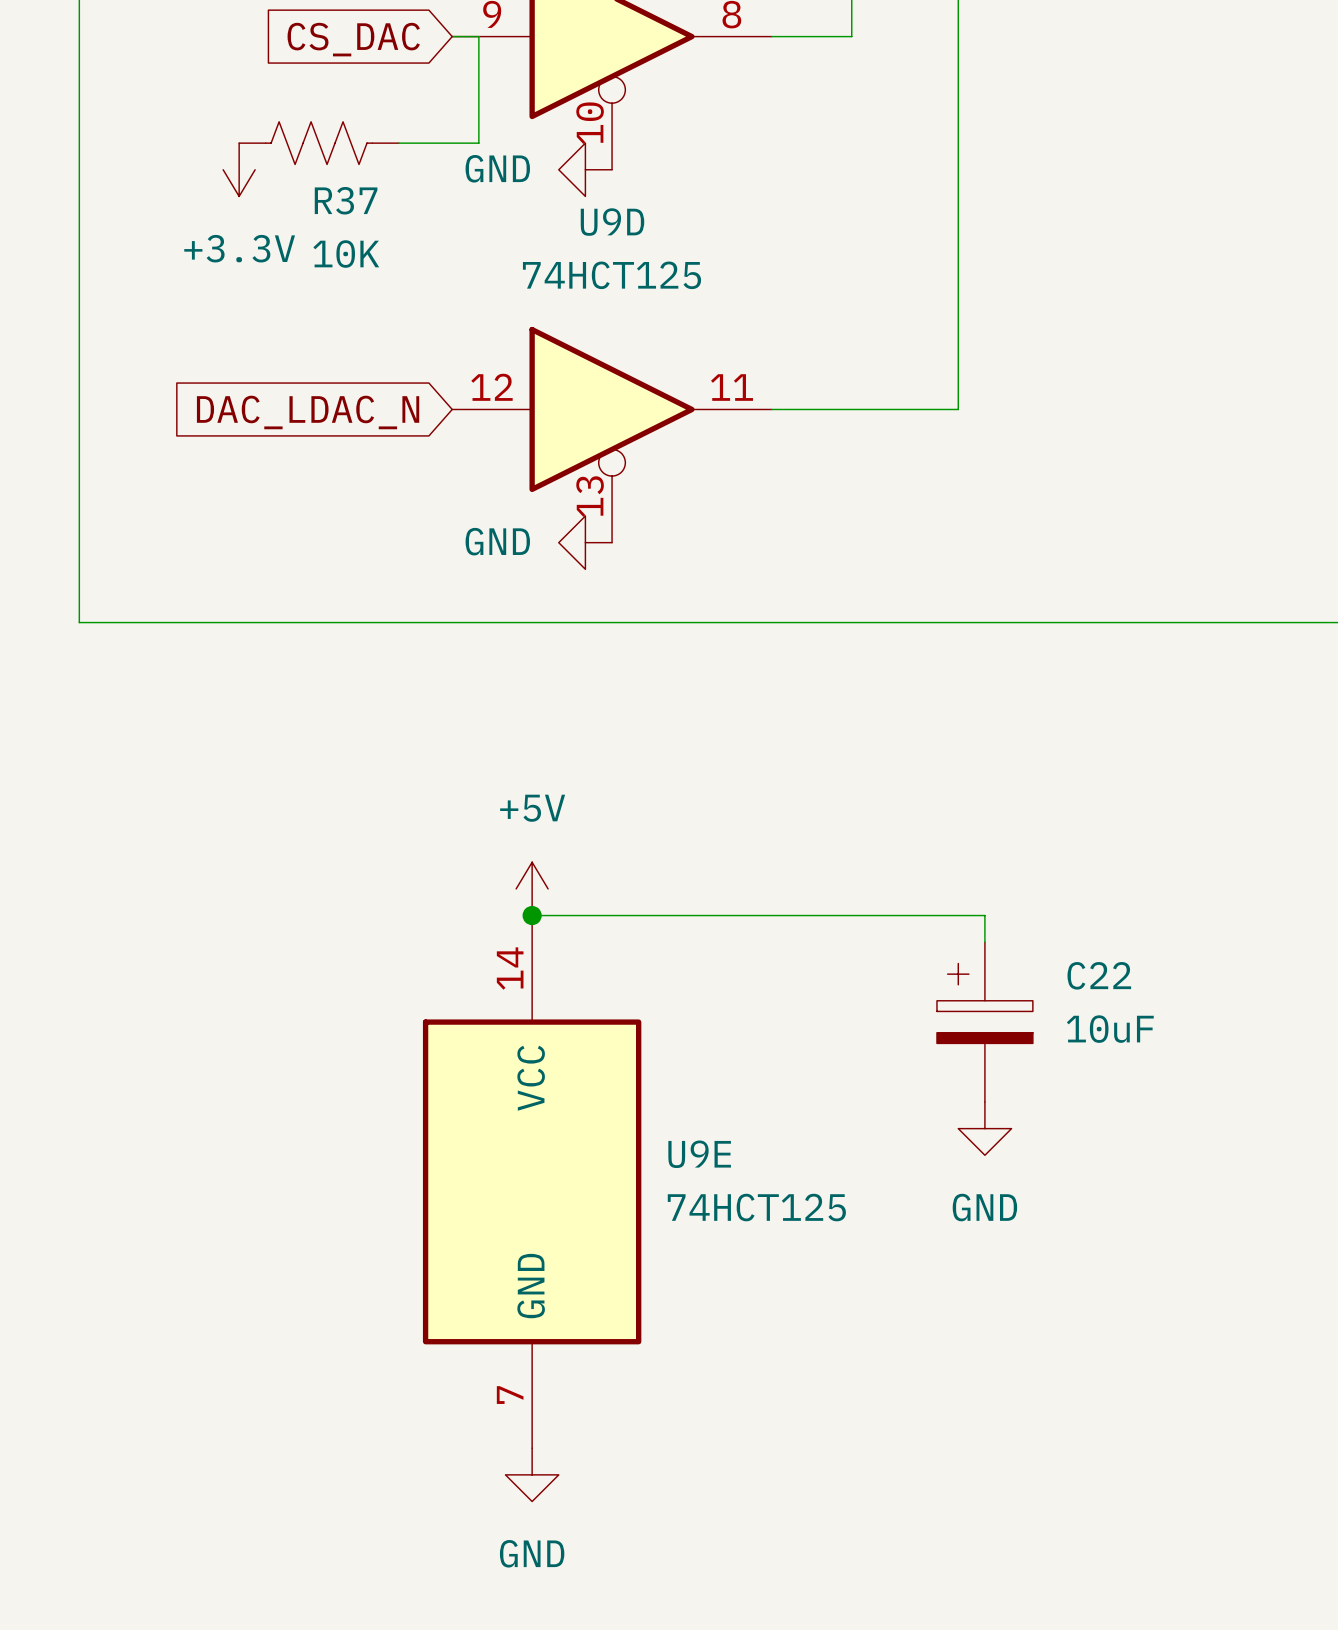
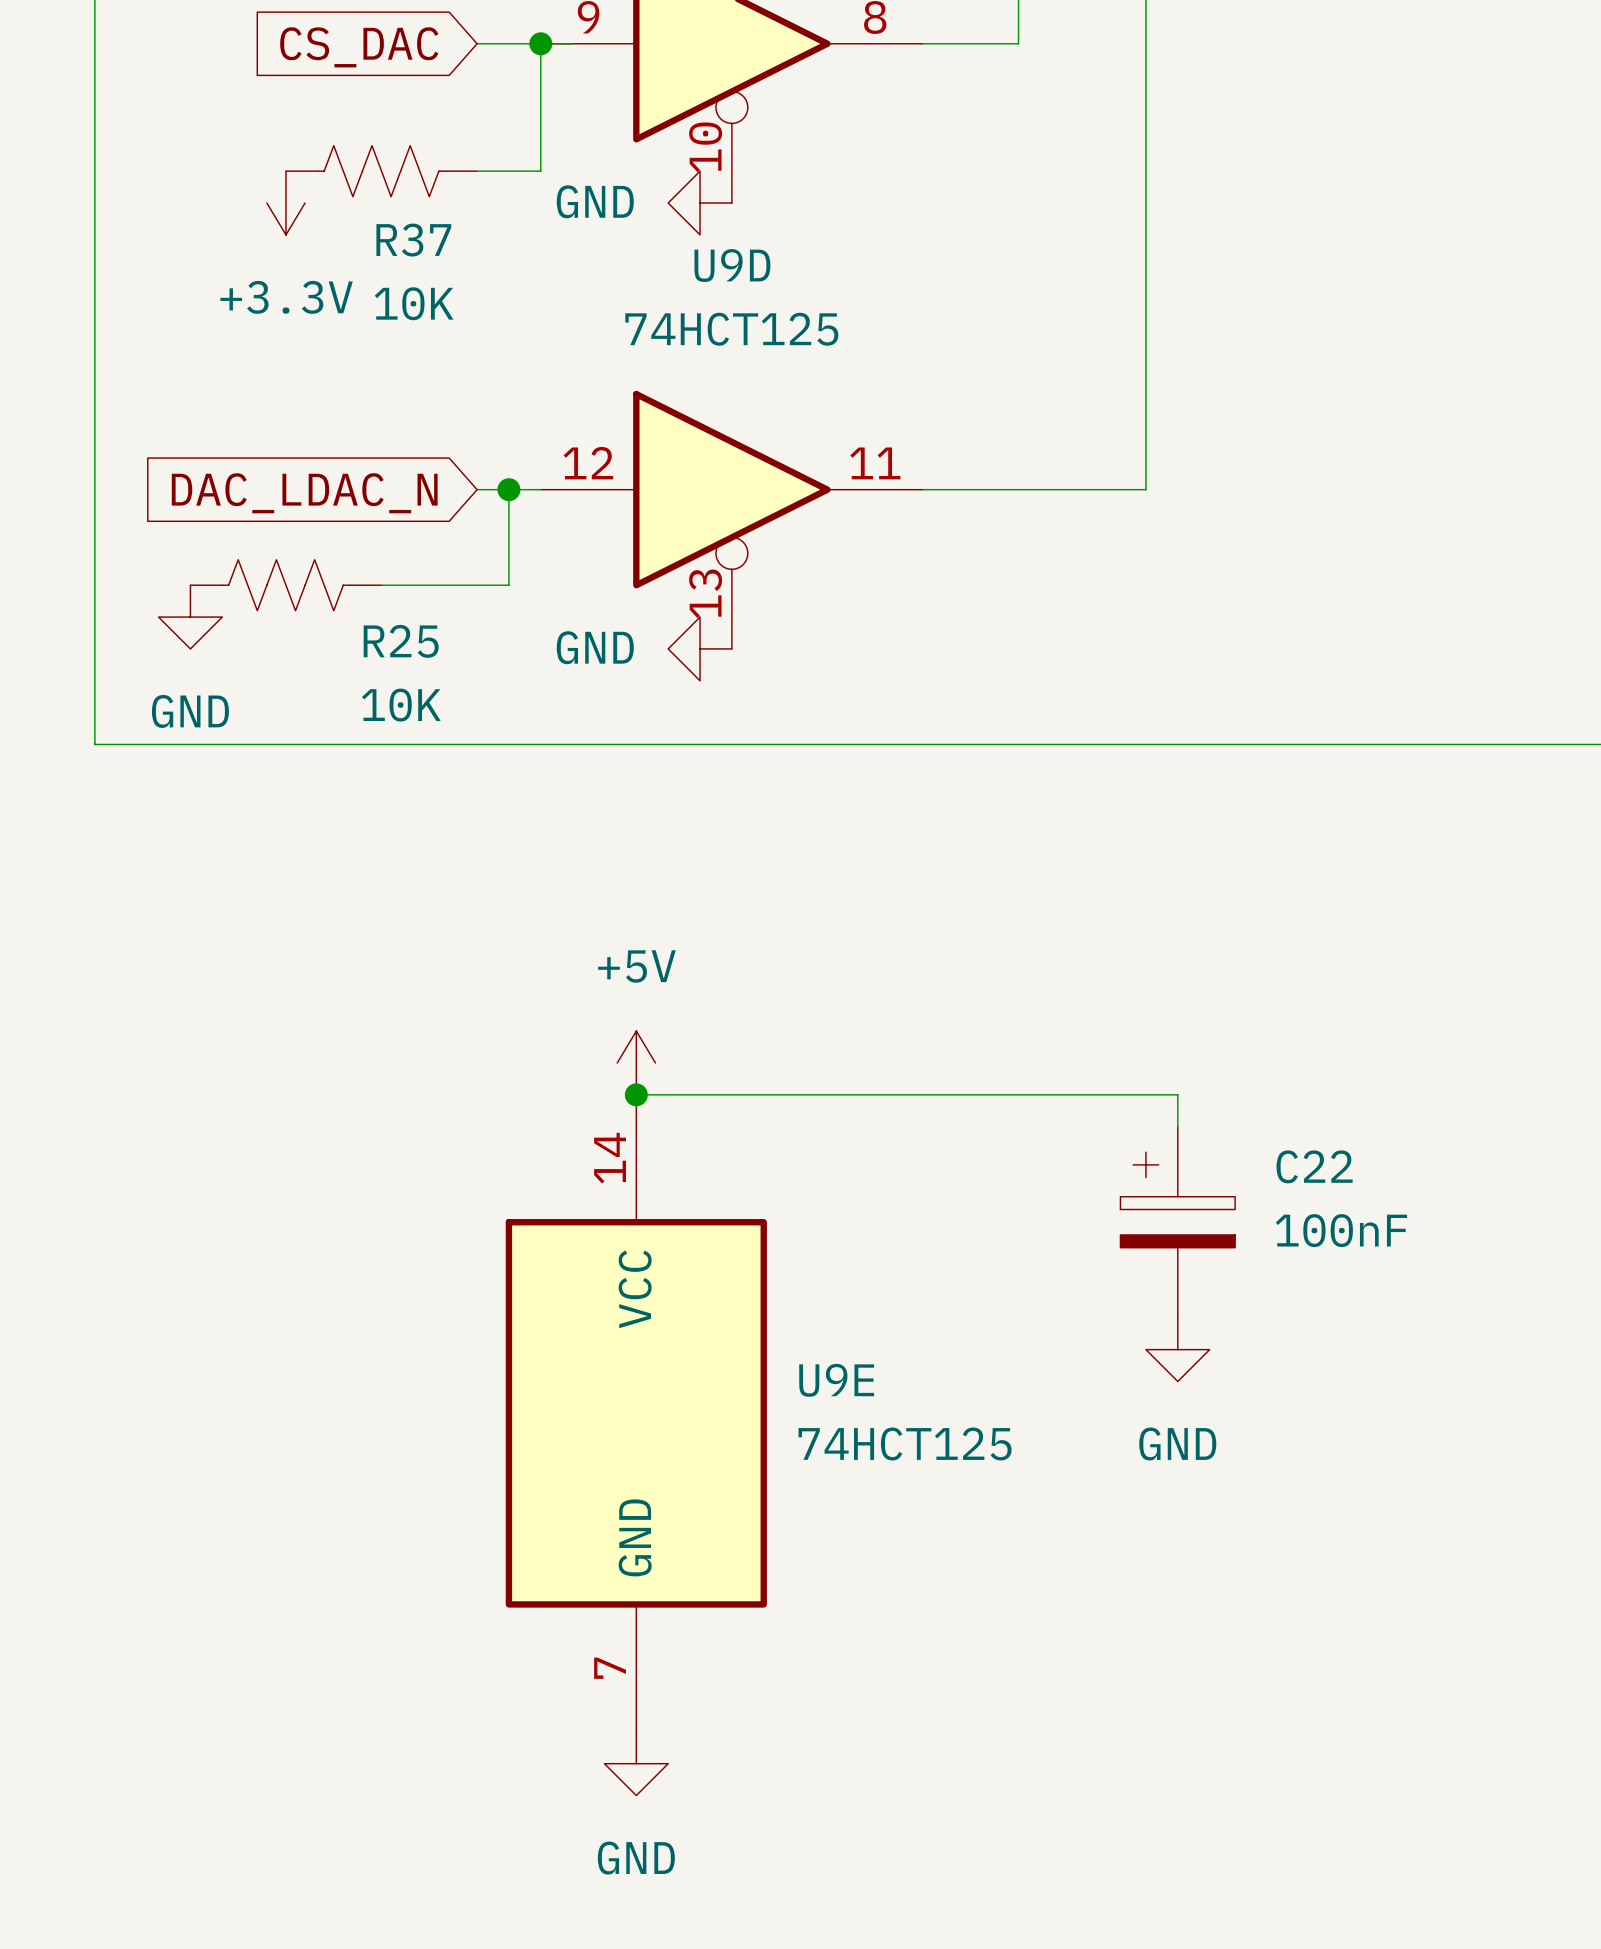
junction: none -> (540, 43)
wire: (478, 36) (478, 143) (452, 143) -> (477, 43) (540, 43) (540, 171)
global label position: CS_DAC (353, 39) -> CS_DAC (359, 47)
wire: none -> (477, 489) (540, 489)
wire: none -> (508, 489) (508, 585) (381, 585)
junction: none -> (508, 489)
global label position: DAC_LDAC_N (308, 412) -> DAC_LDAC_N (304, 493)
R25: none -> 10K (285, 585)
power symbol: none -> GND (190, 617)
C22 value: 10uF (1110, 1029) -> 100nF (1341, 1230)

